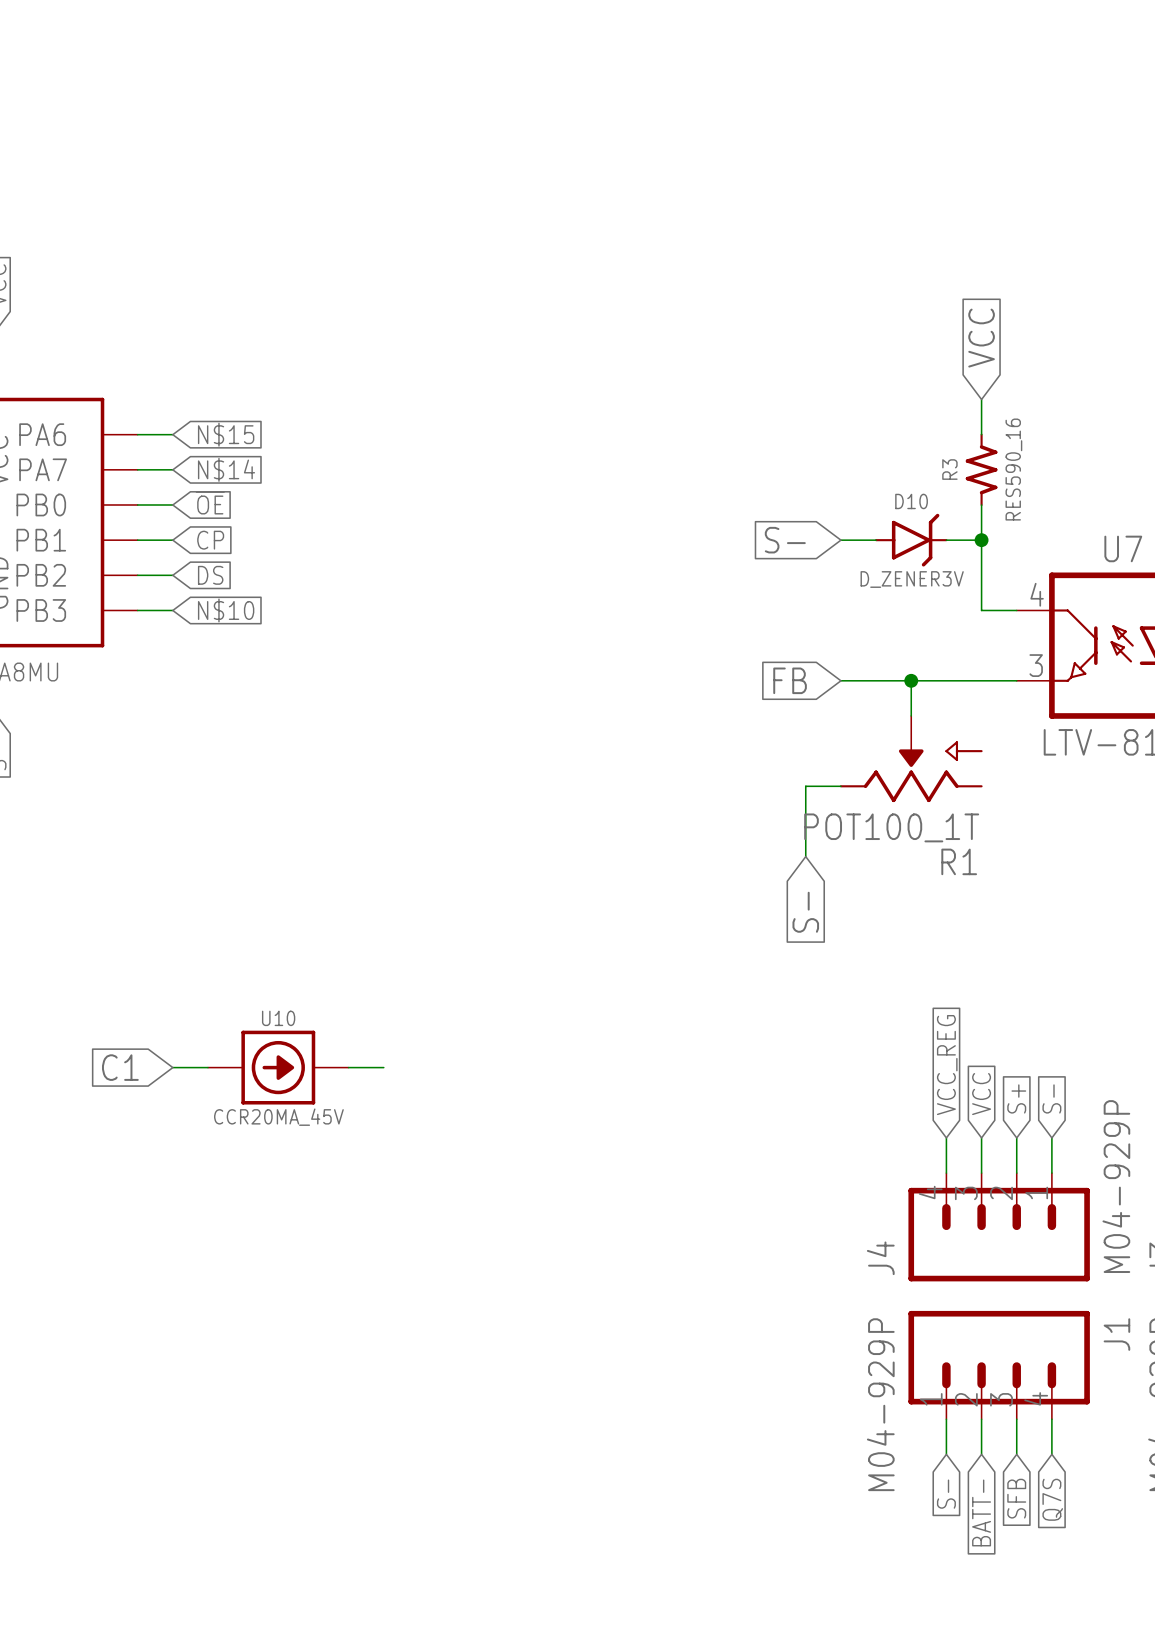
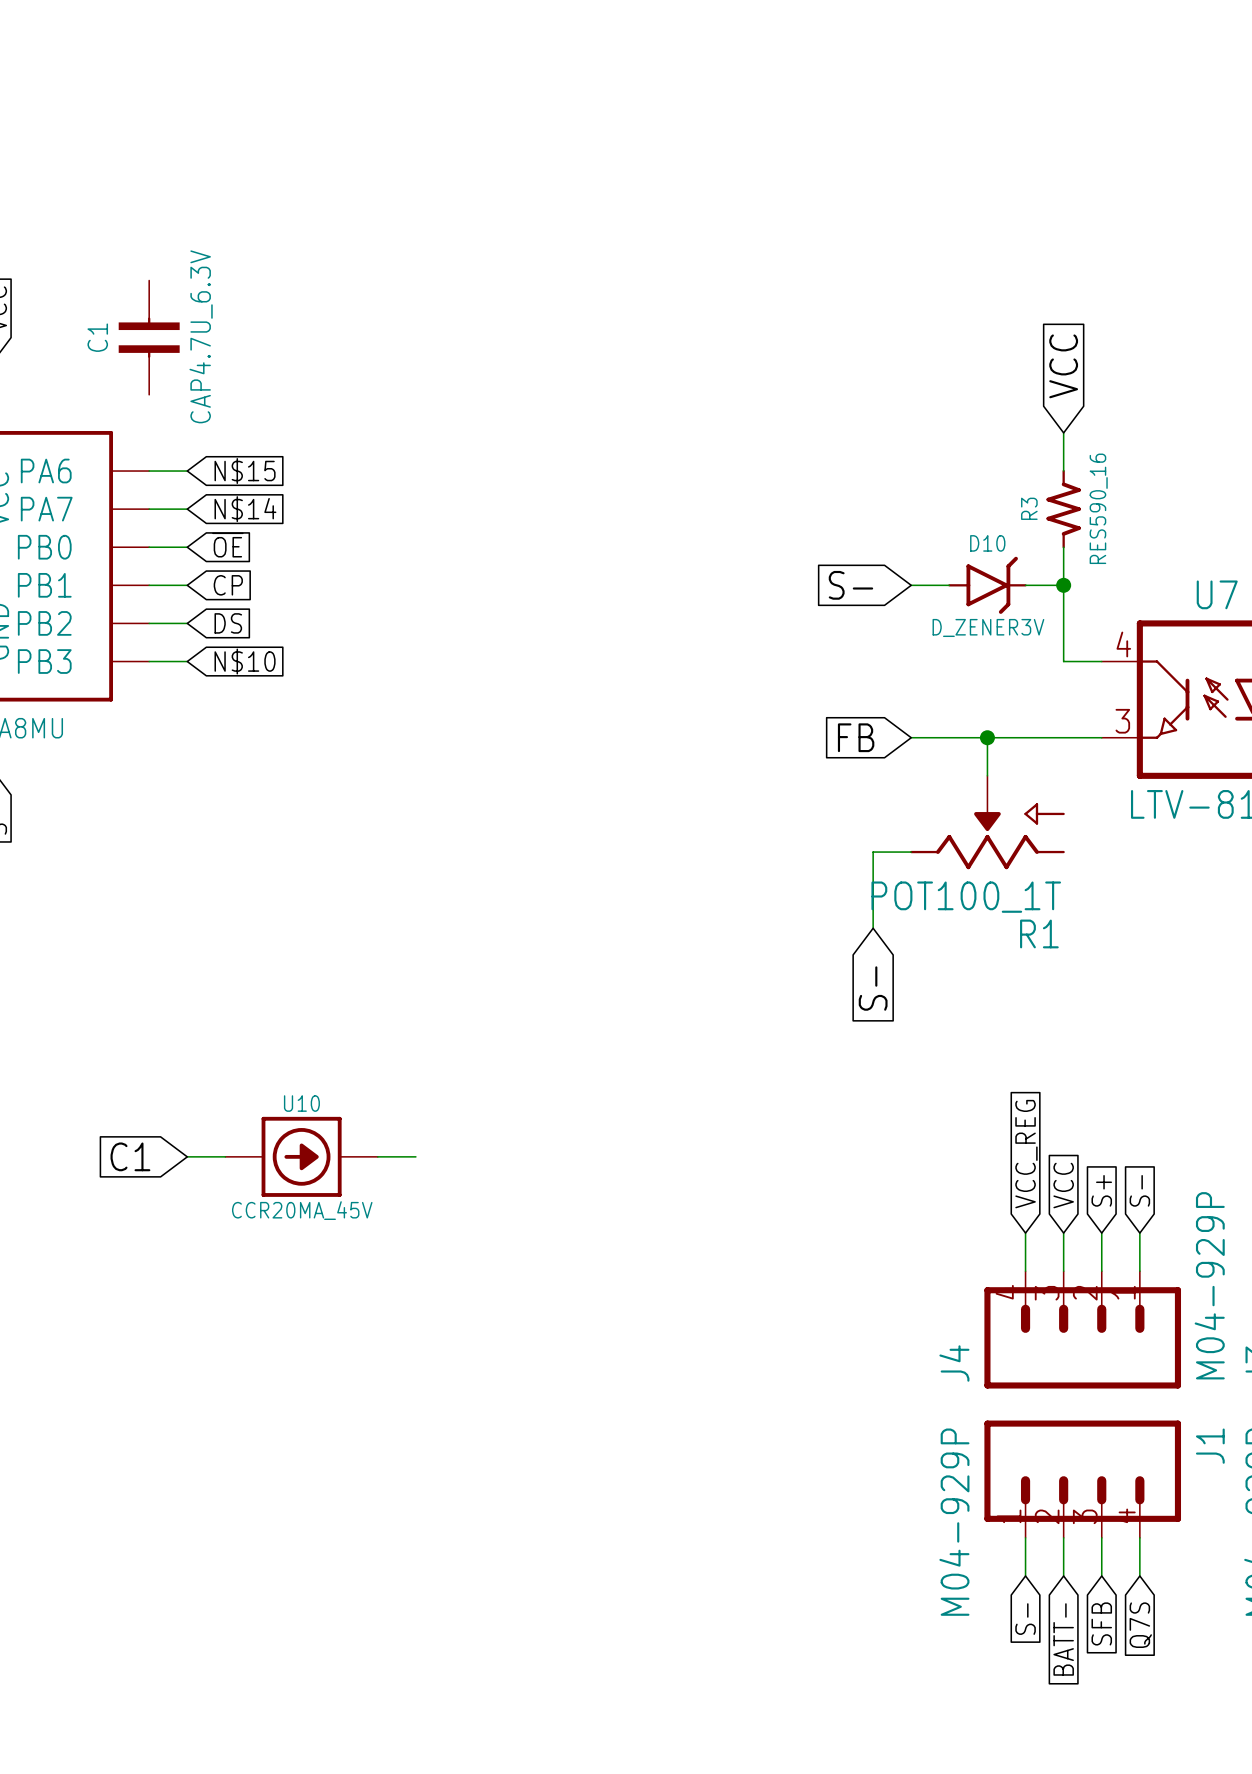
C1: none -> CAP4.7U_6.3V (149, 337)

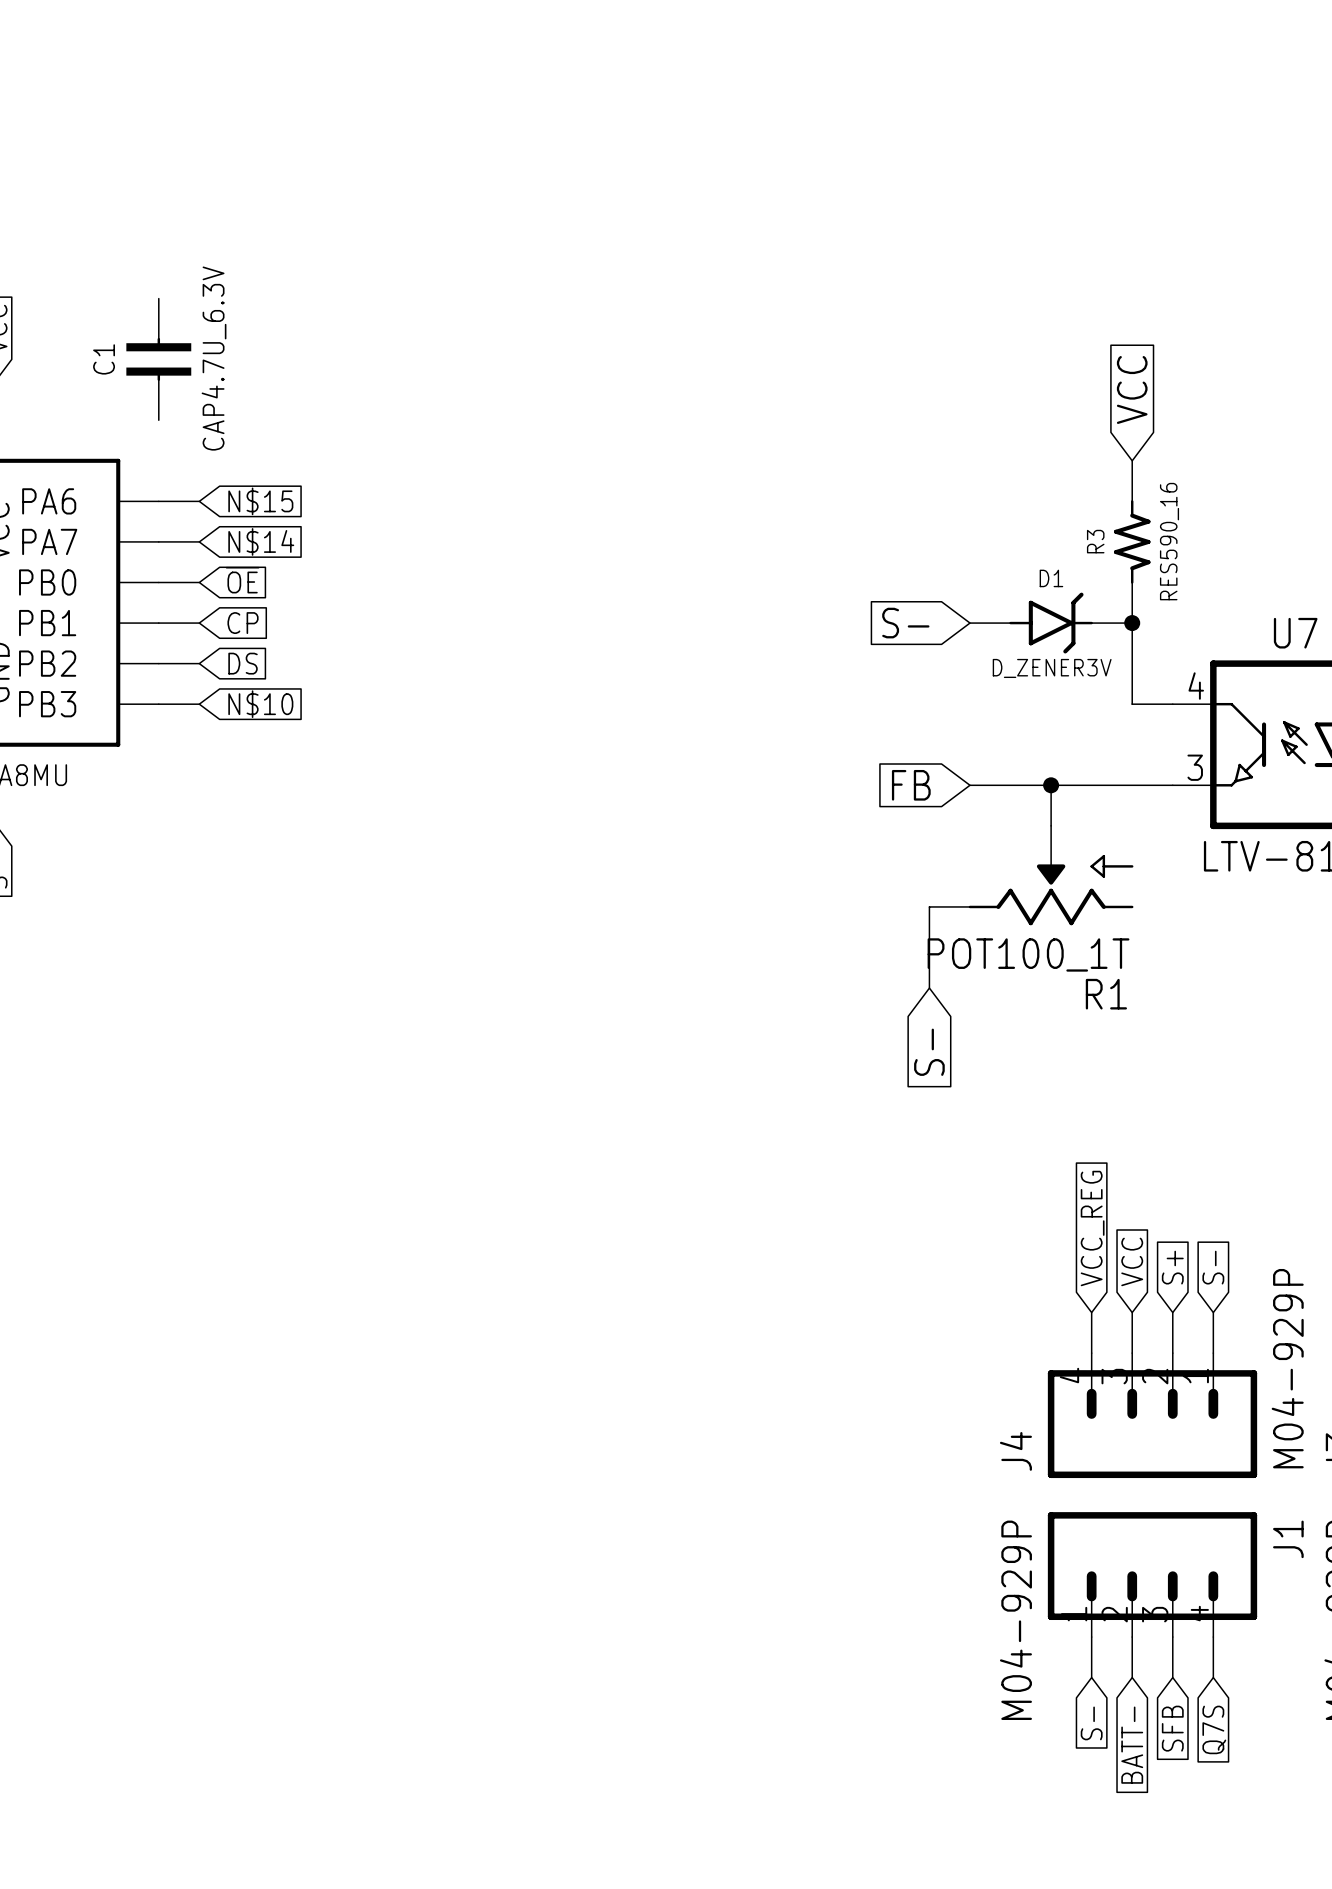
D10 name: D10 (987, 543) -> D1 (1051, 578)
global label: C1 (130, 1156) -> none
wire: (187, 1156) (225, 1156) -> none
U10: CCR20MA_45V (301, 1156) -> none
wire: (377, 1156) (415, 1156) -> none

